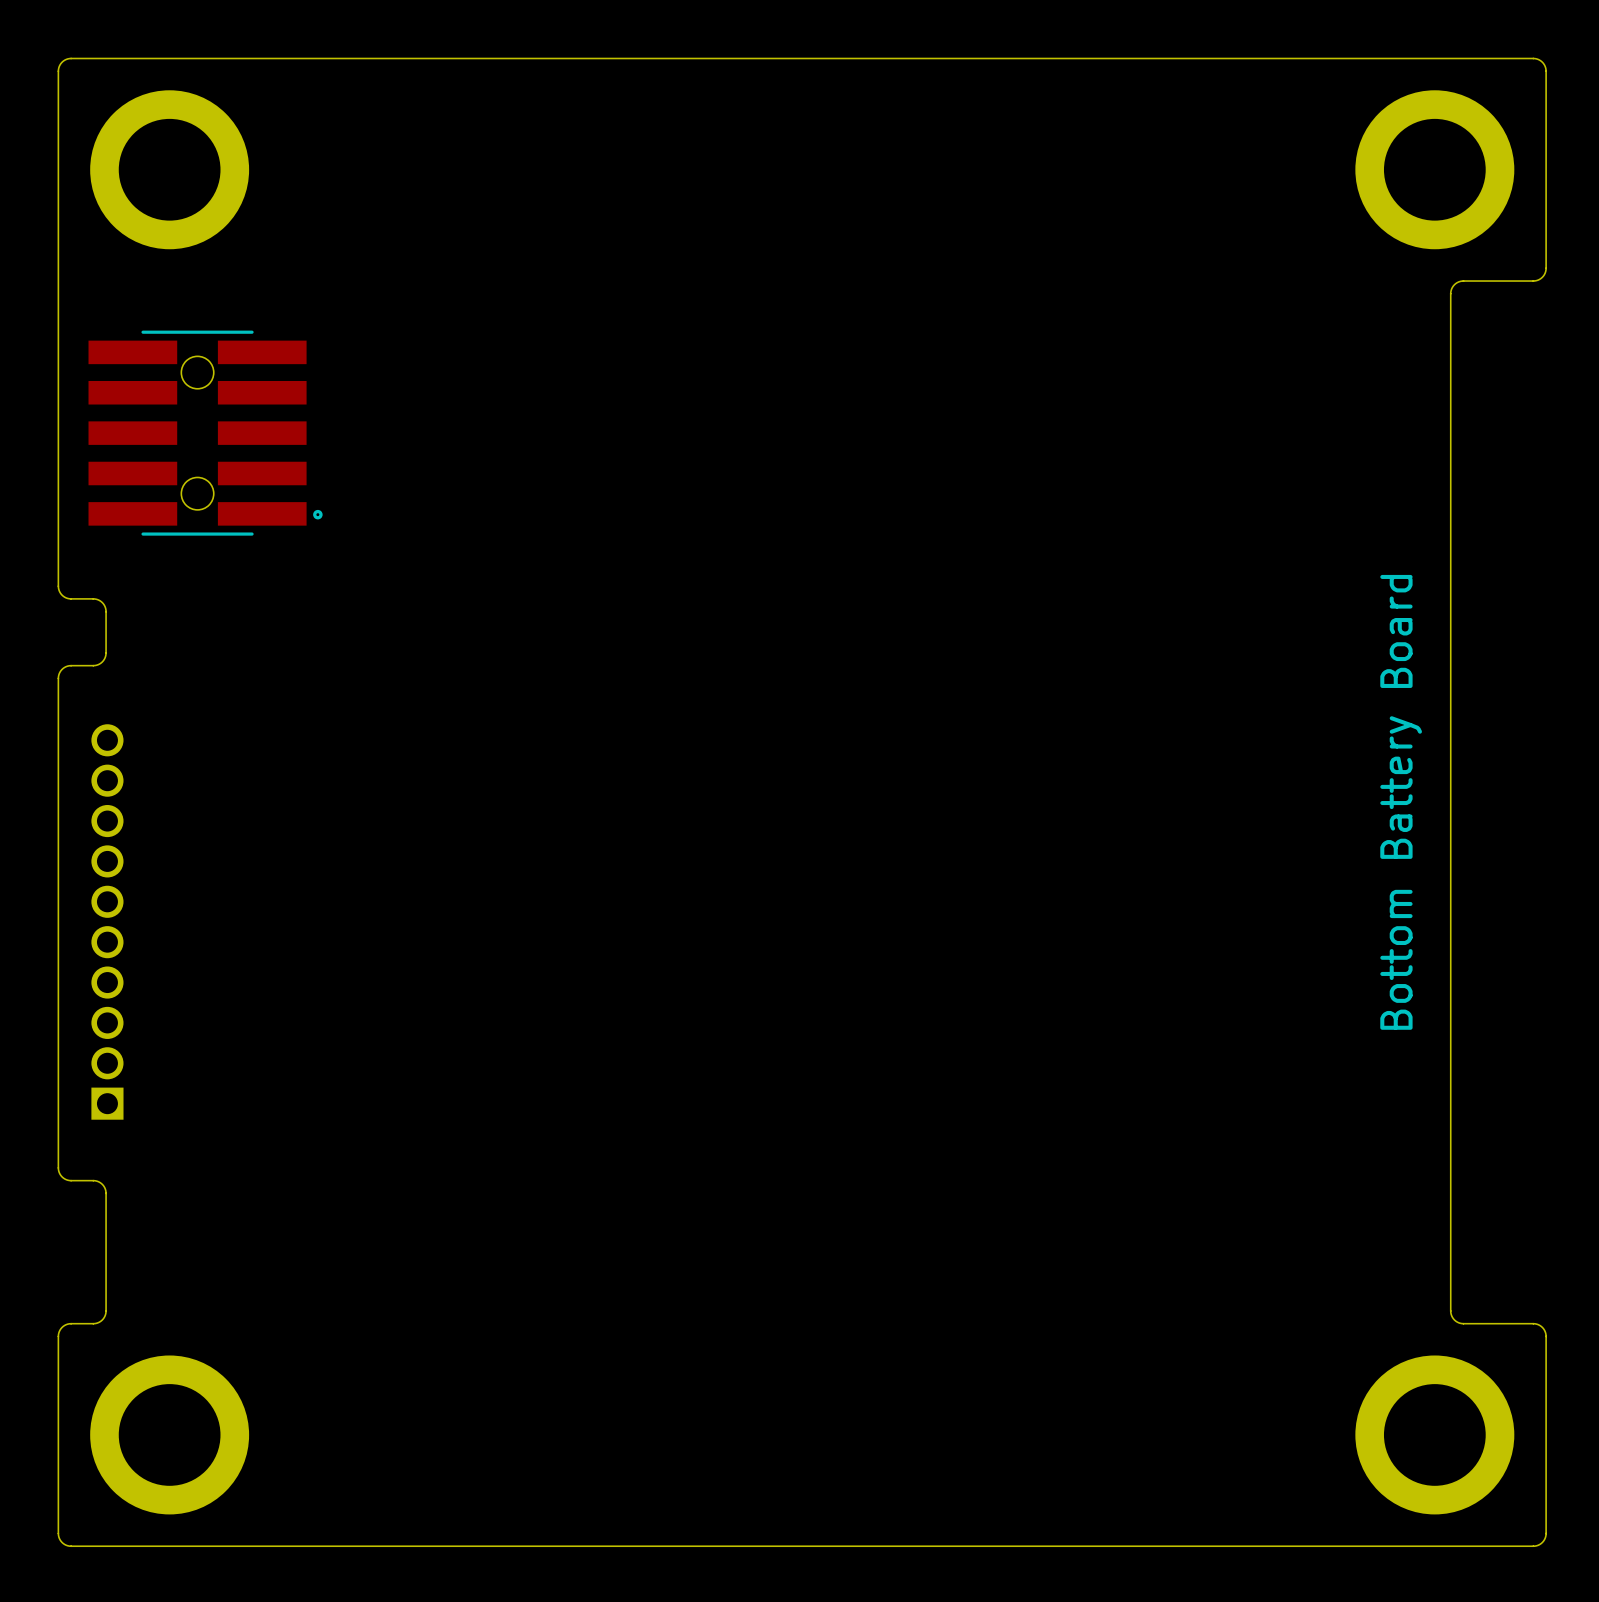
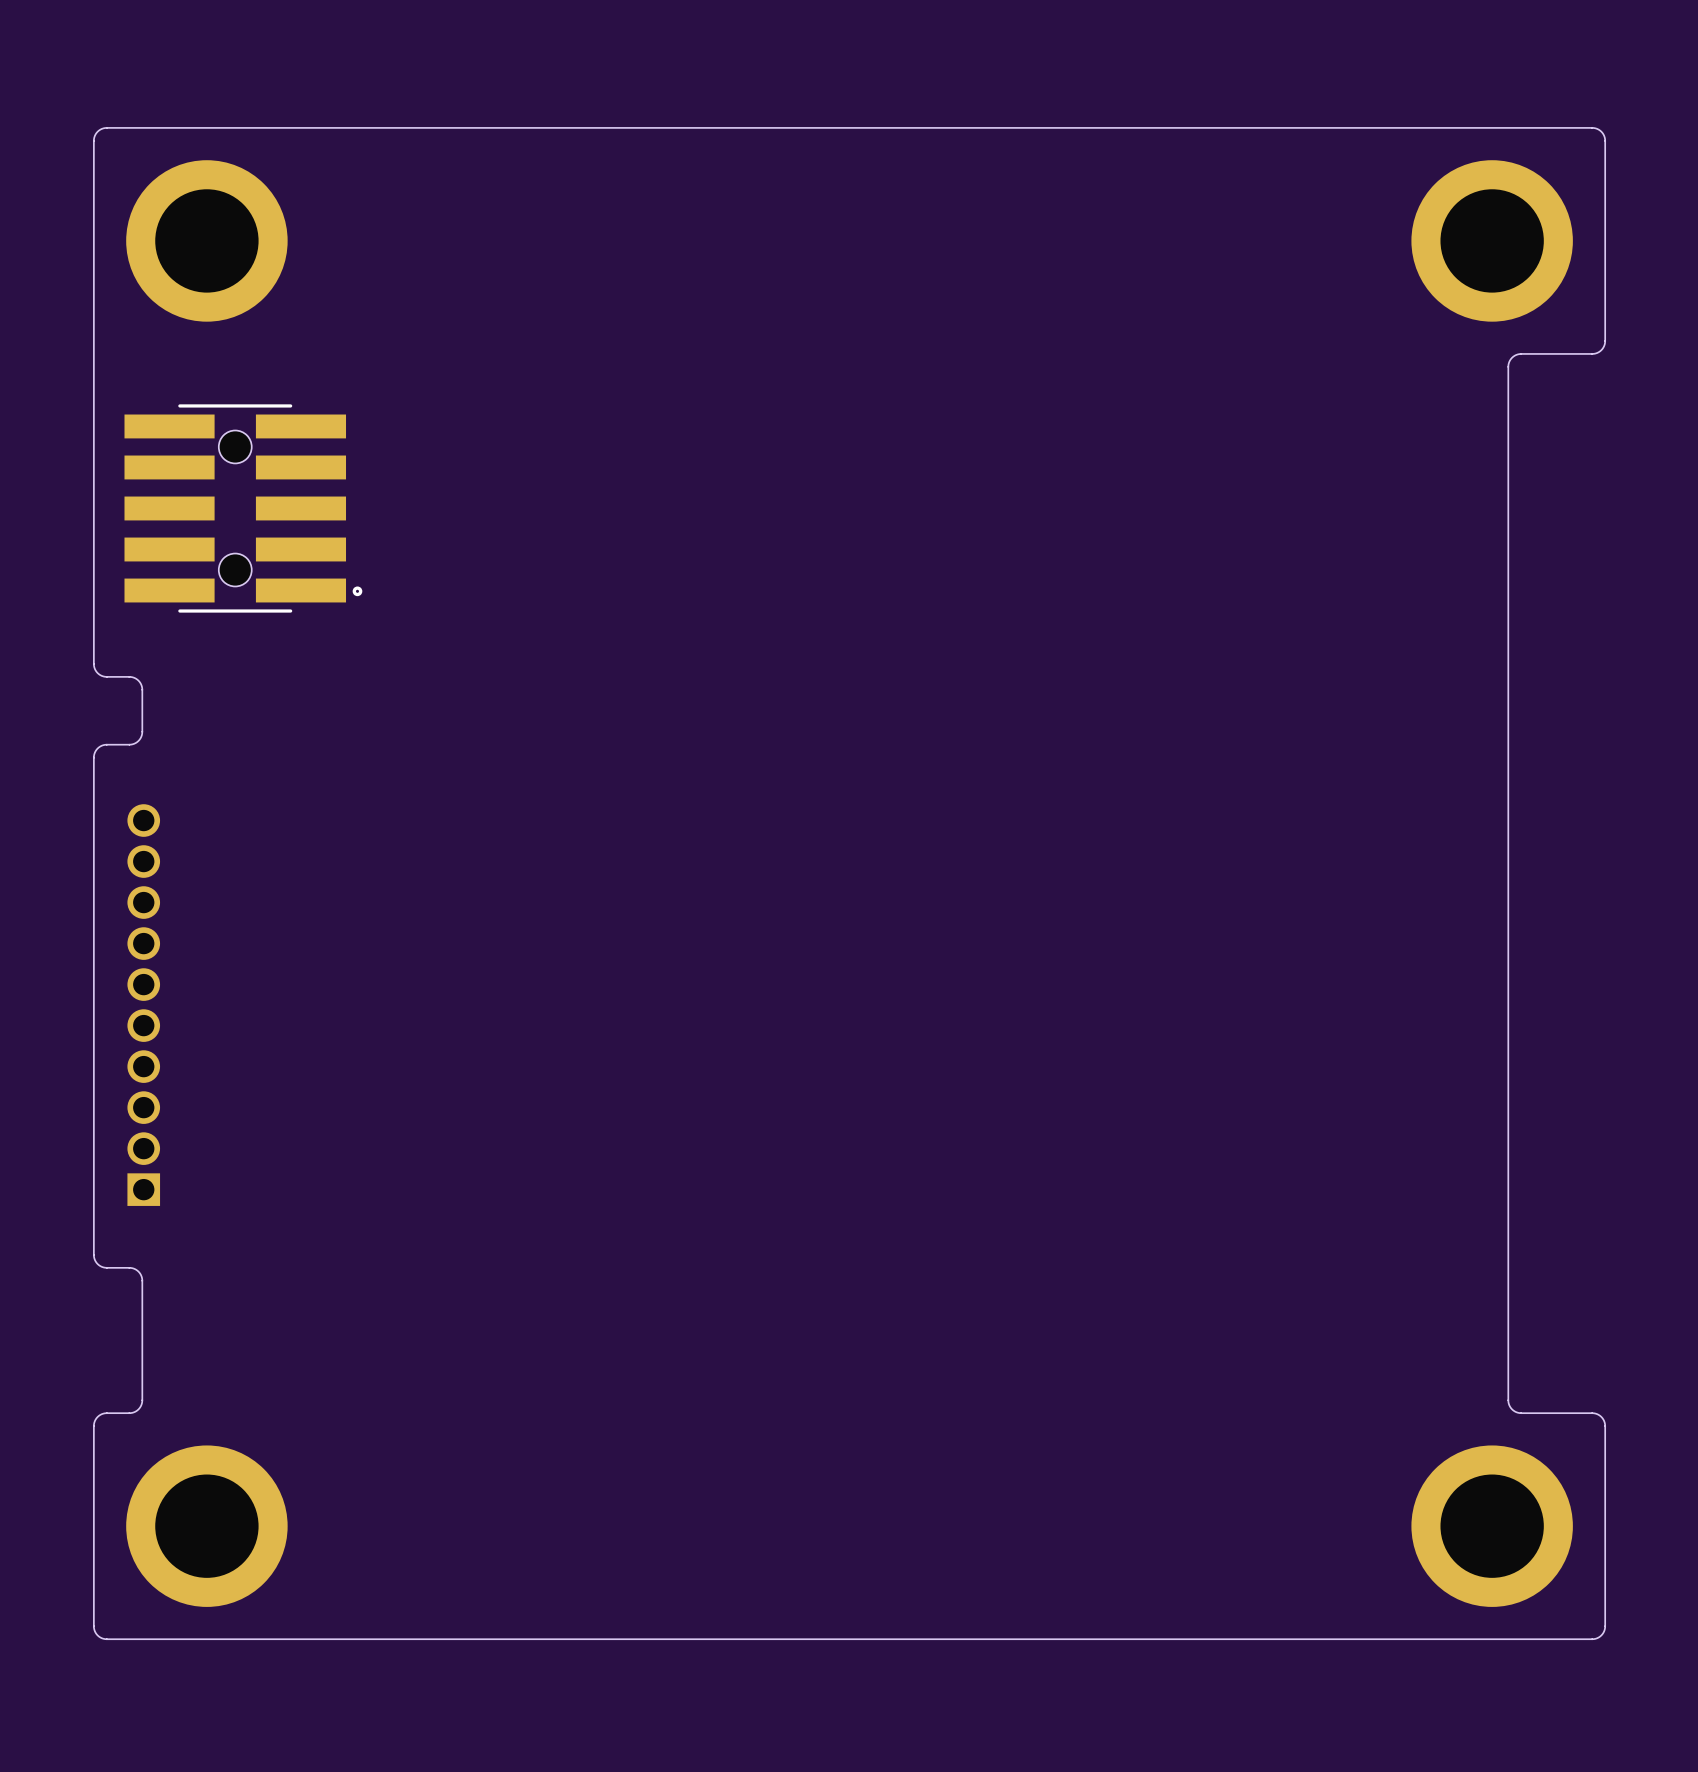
text: Bottom Battery Board (1401, 802) -> none

